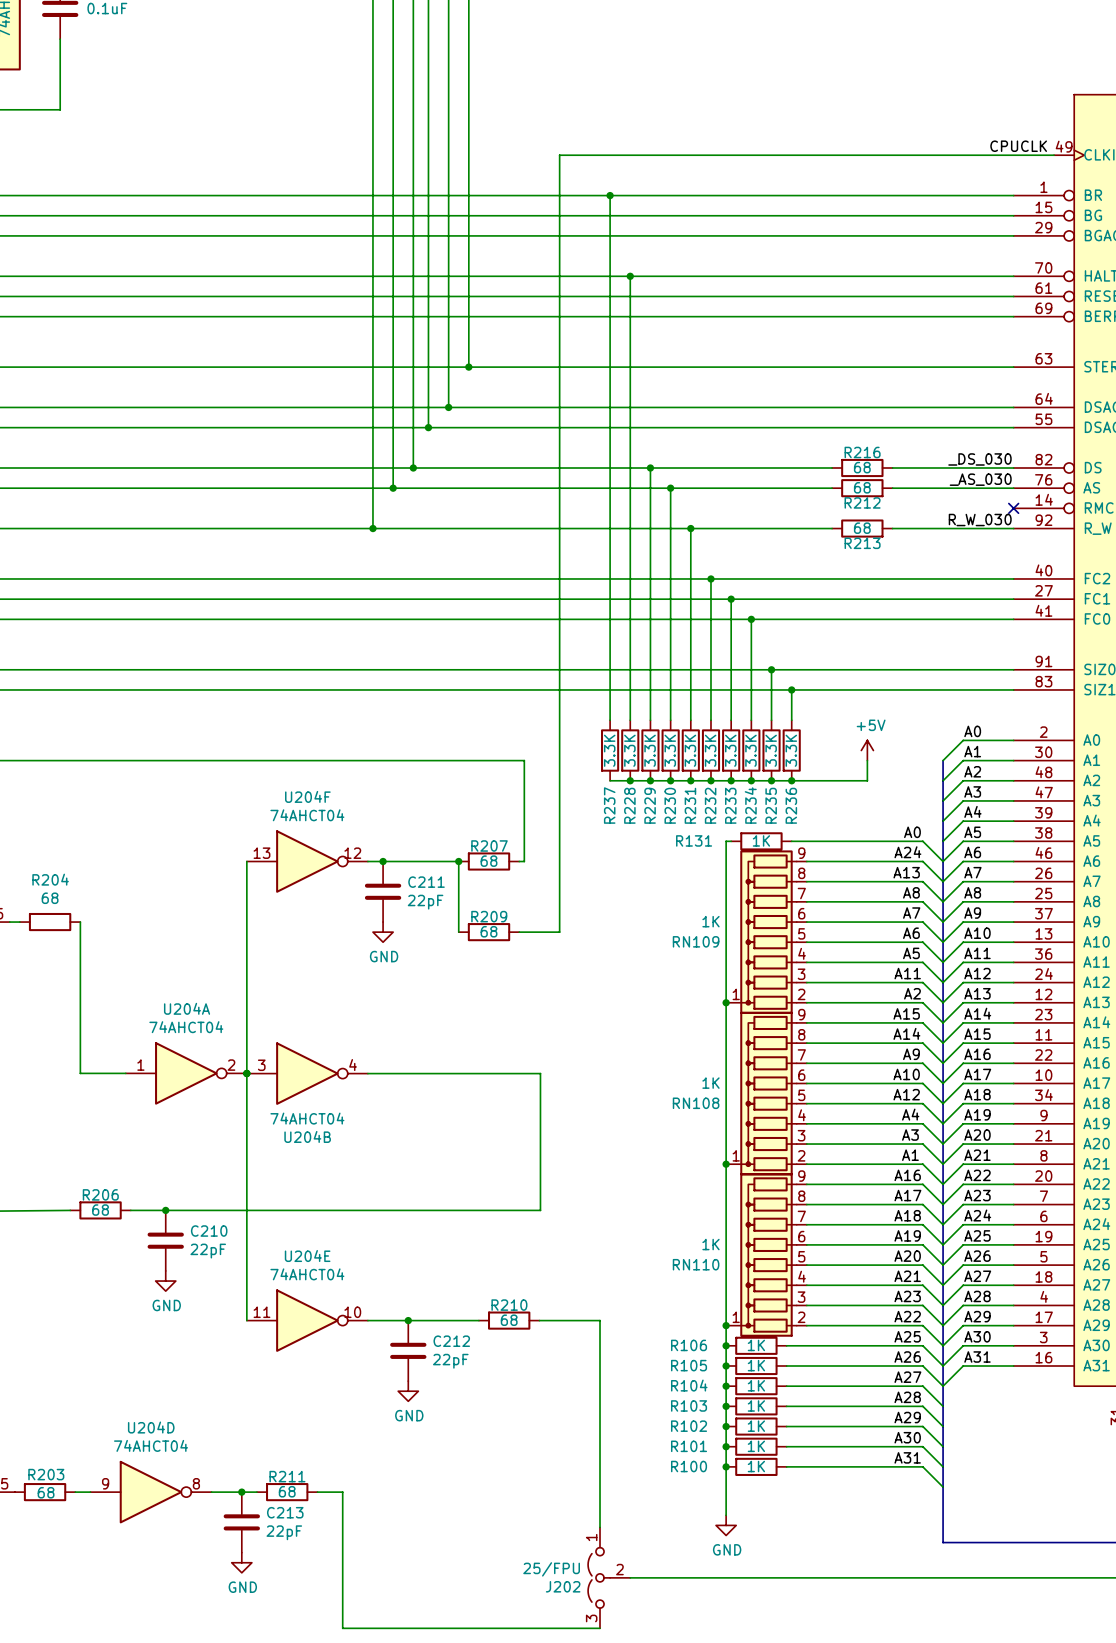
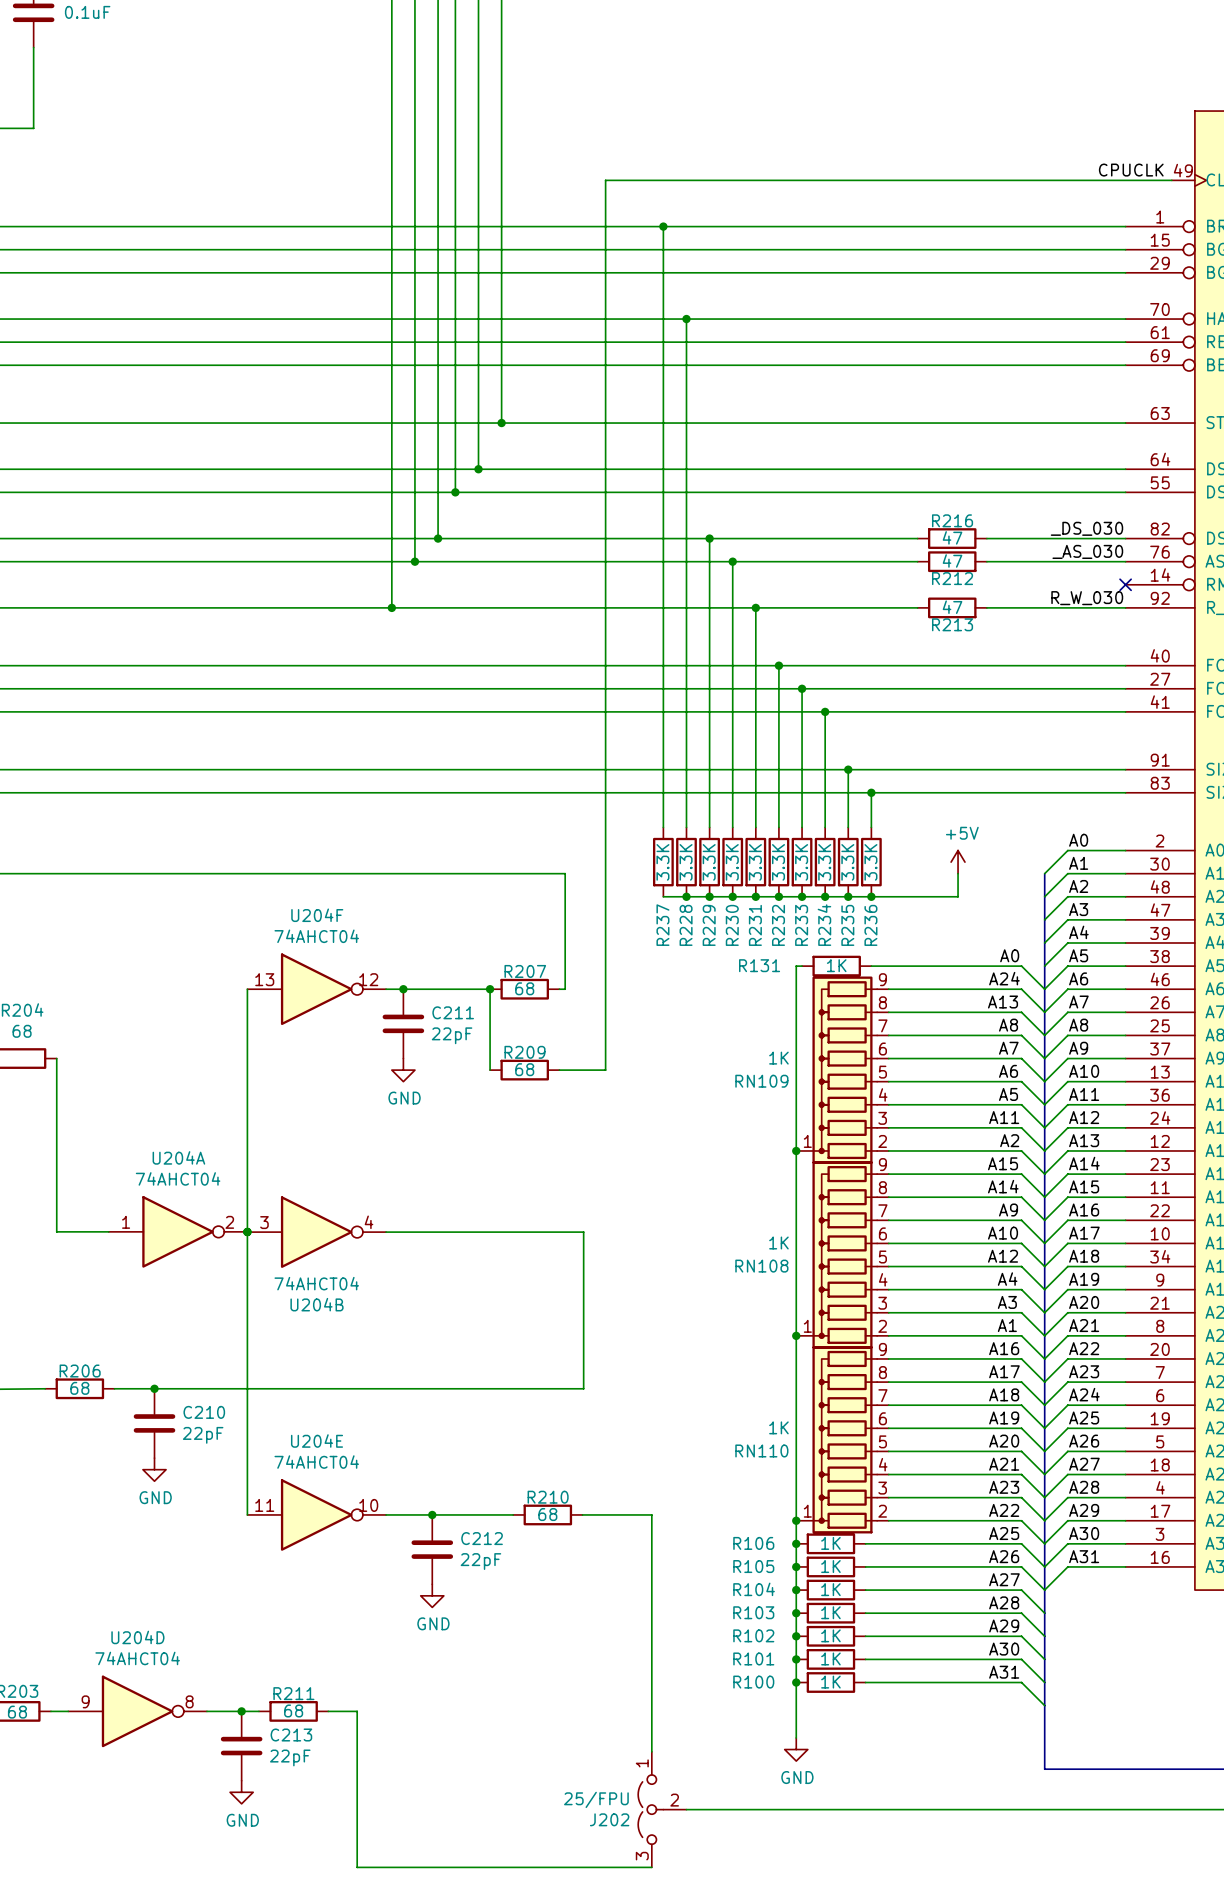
R216 value: 68 (862, 467) -> 47 (952, 537)
R212 value: 68 (862, 487) -> 47 (952, 560)
R213 value: 68 (862, 528) -> 47 (952, 607)

